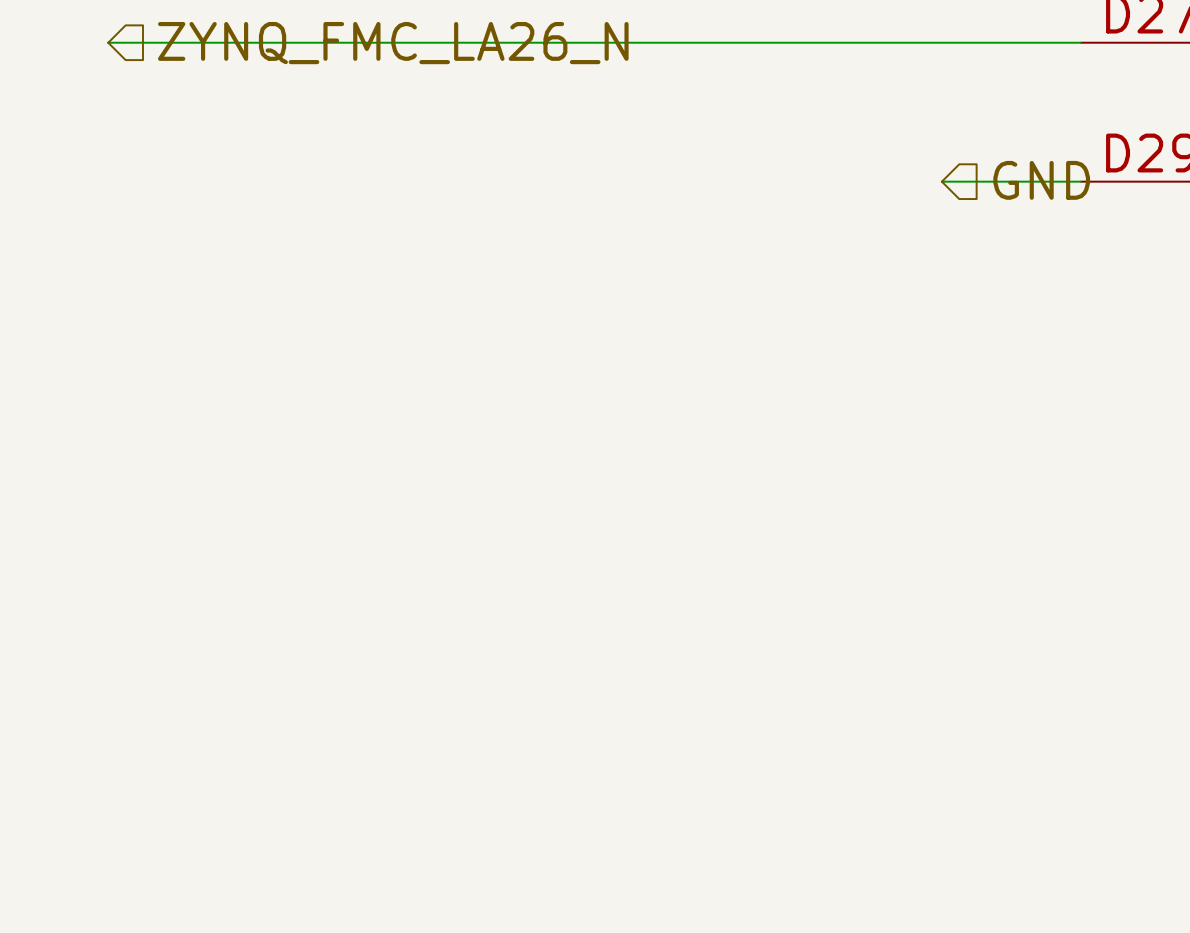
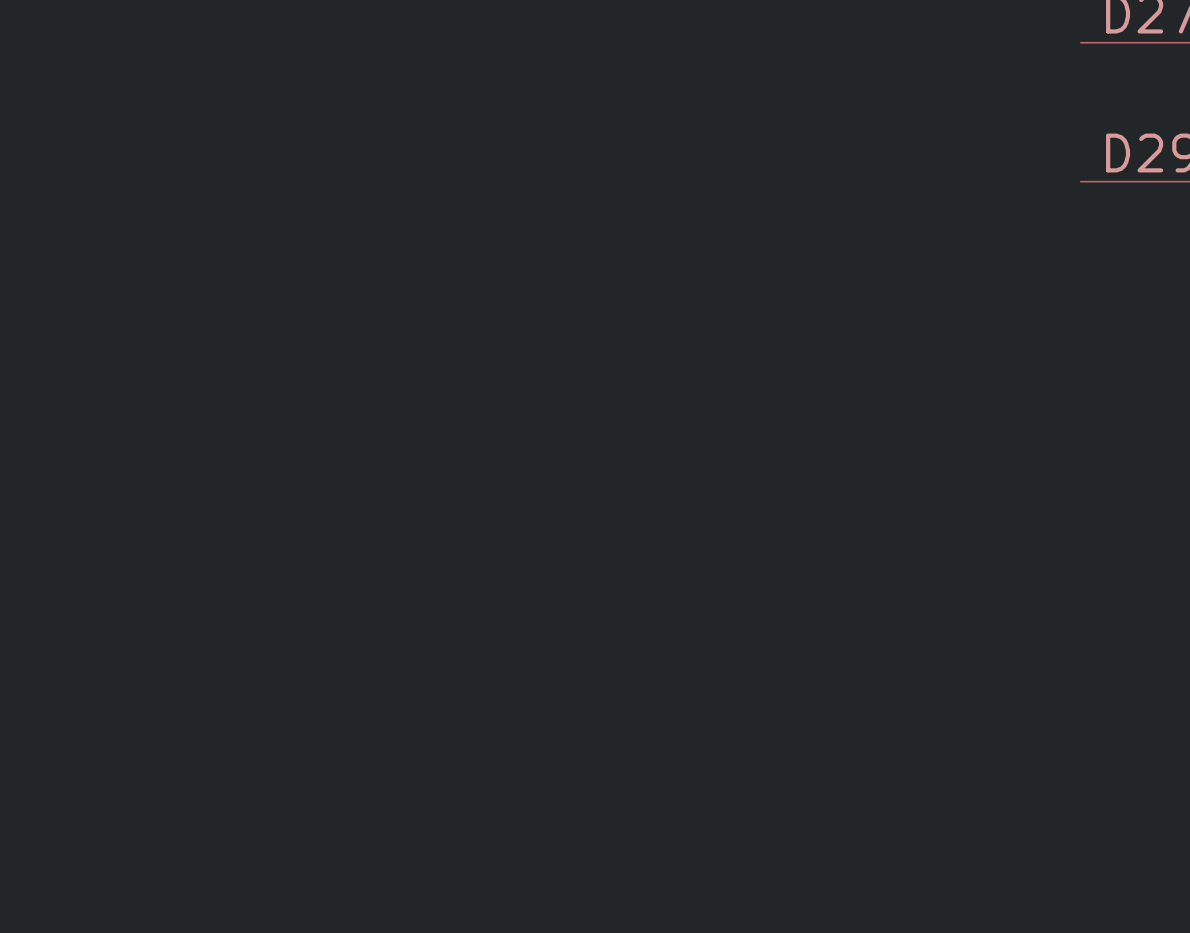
wire: (108, 42) (1080, 42) -> none
hierarchical label: ZYNQ_FMC_LA26_N (393, 43) -> none
hierarchical label: GND (1041, 180) -> none
wire: (941, 181) (1080, 181) -> none

